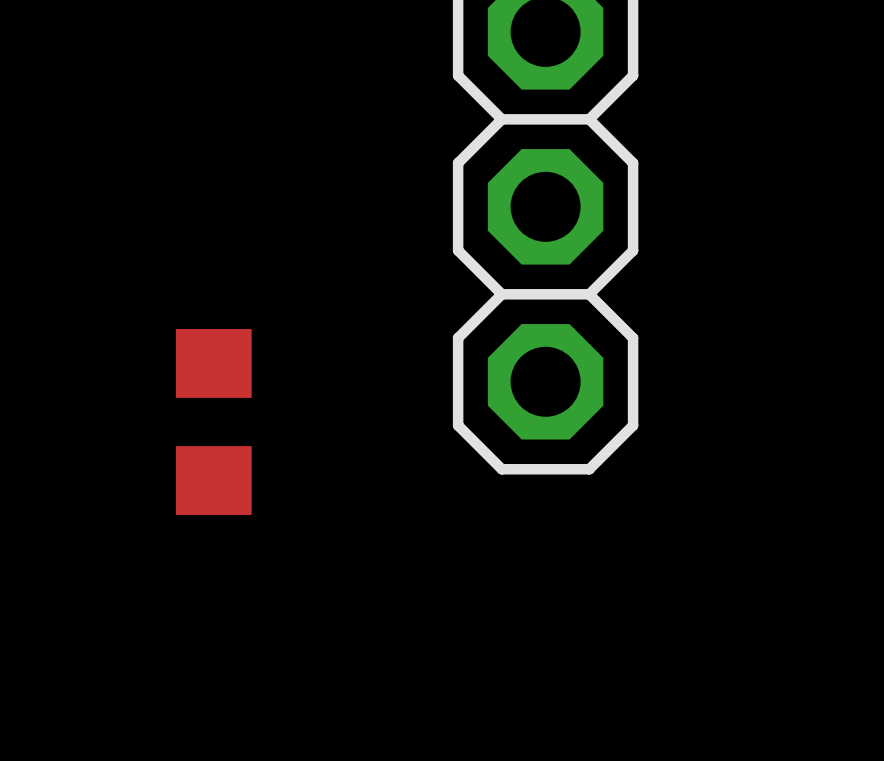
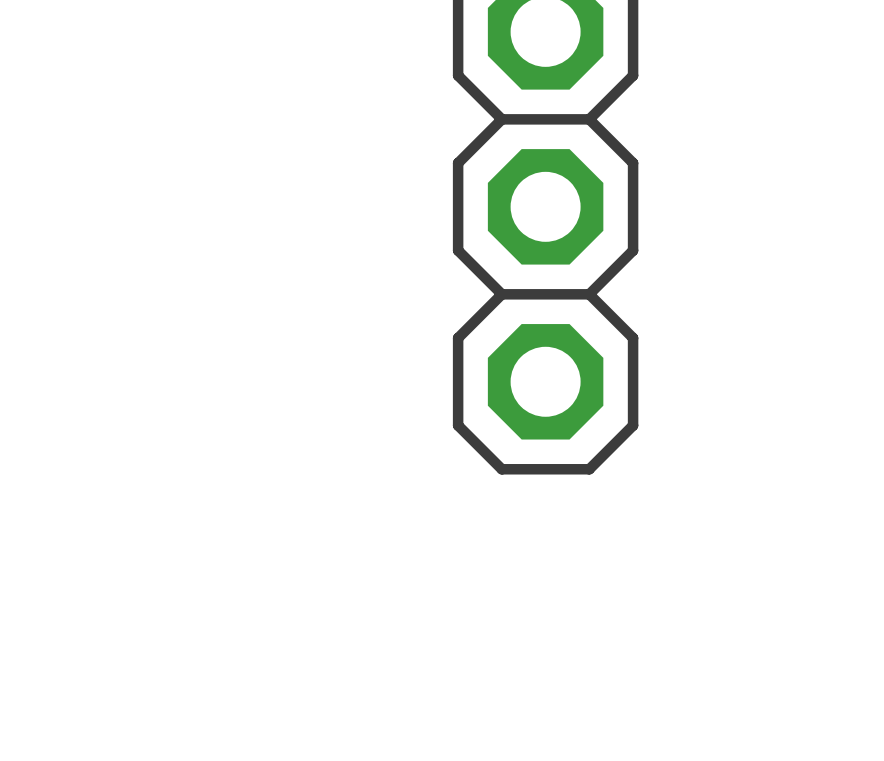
part: (213, 422) -> none

